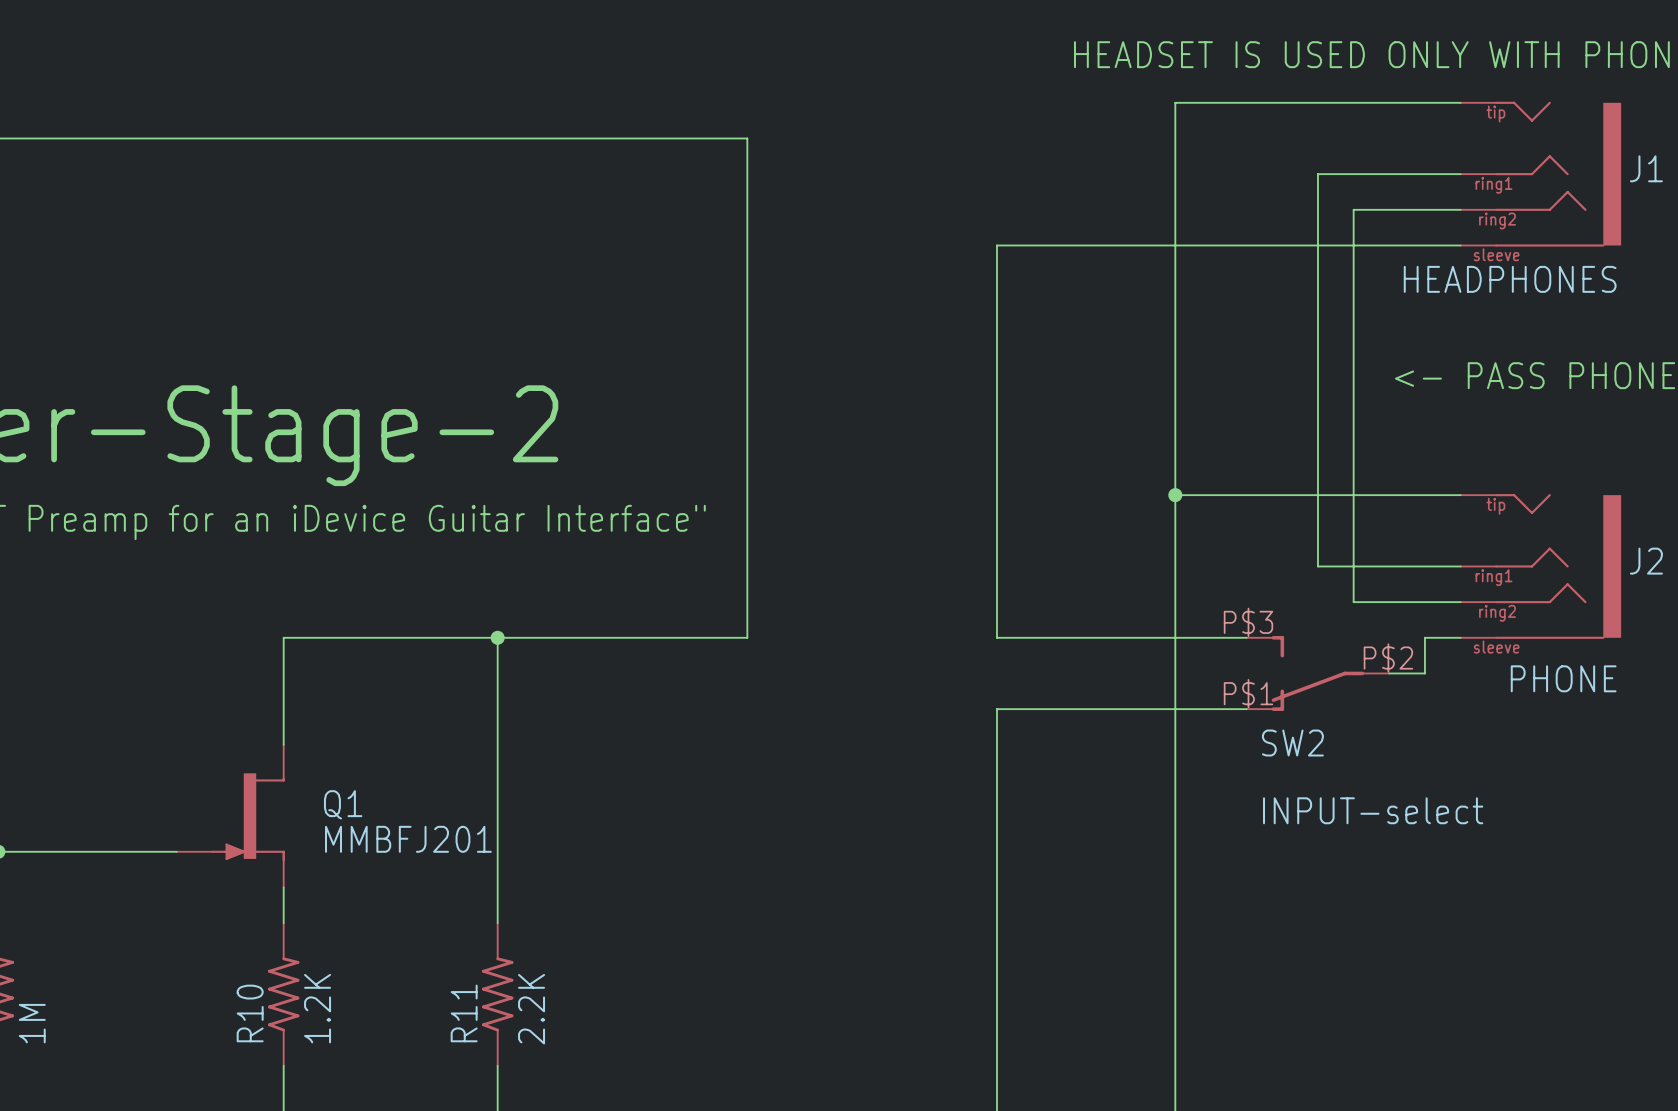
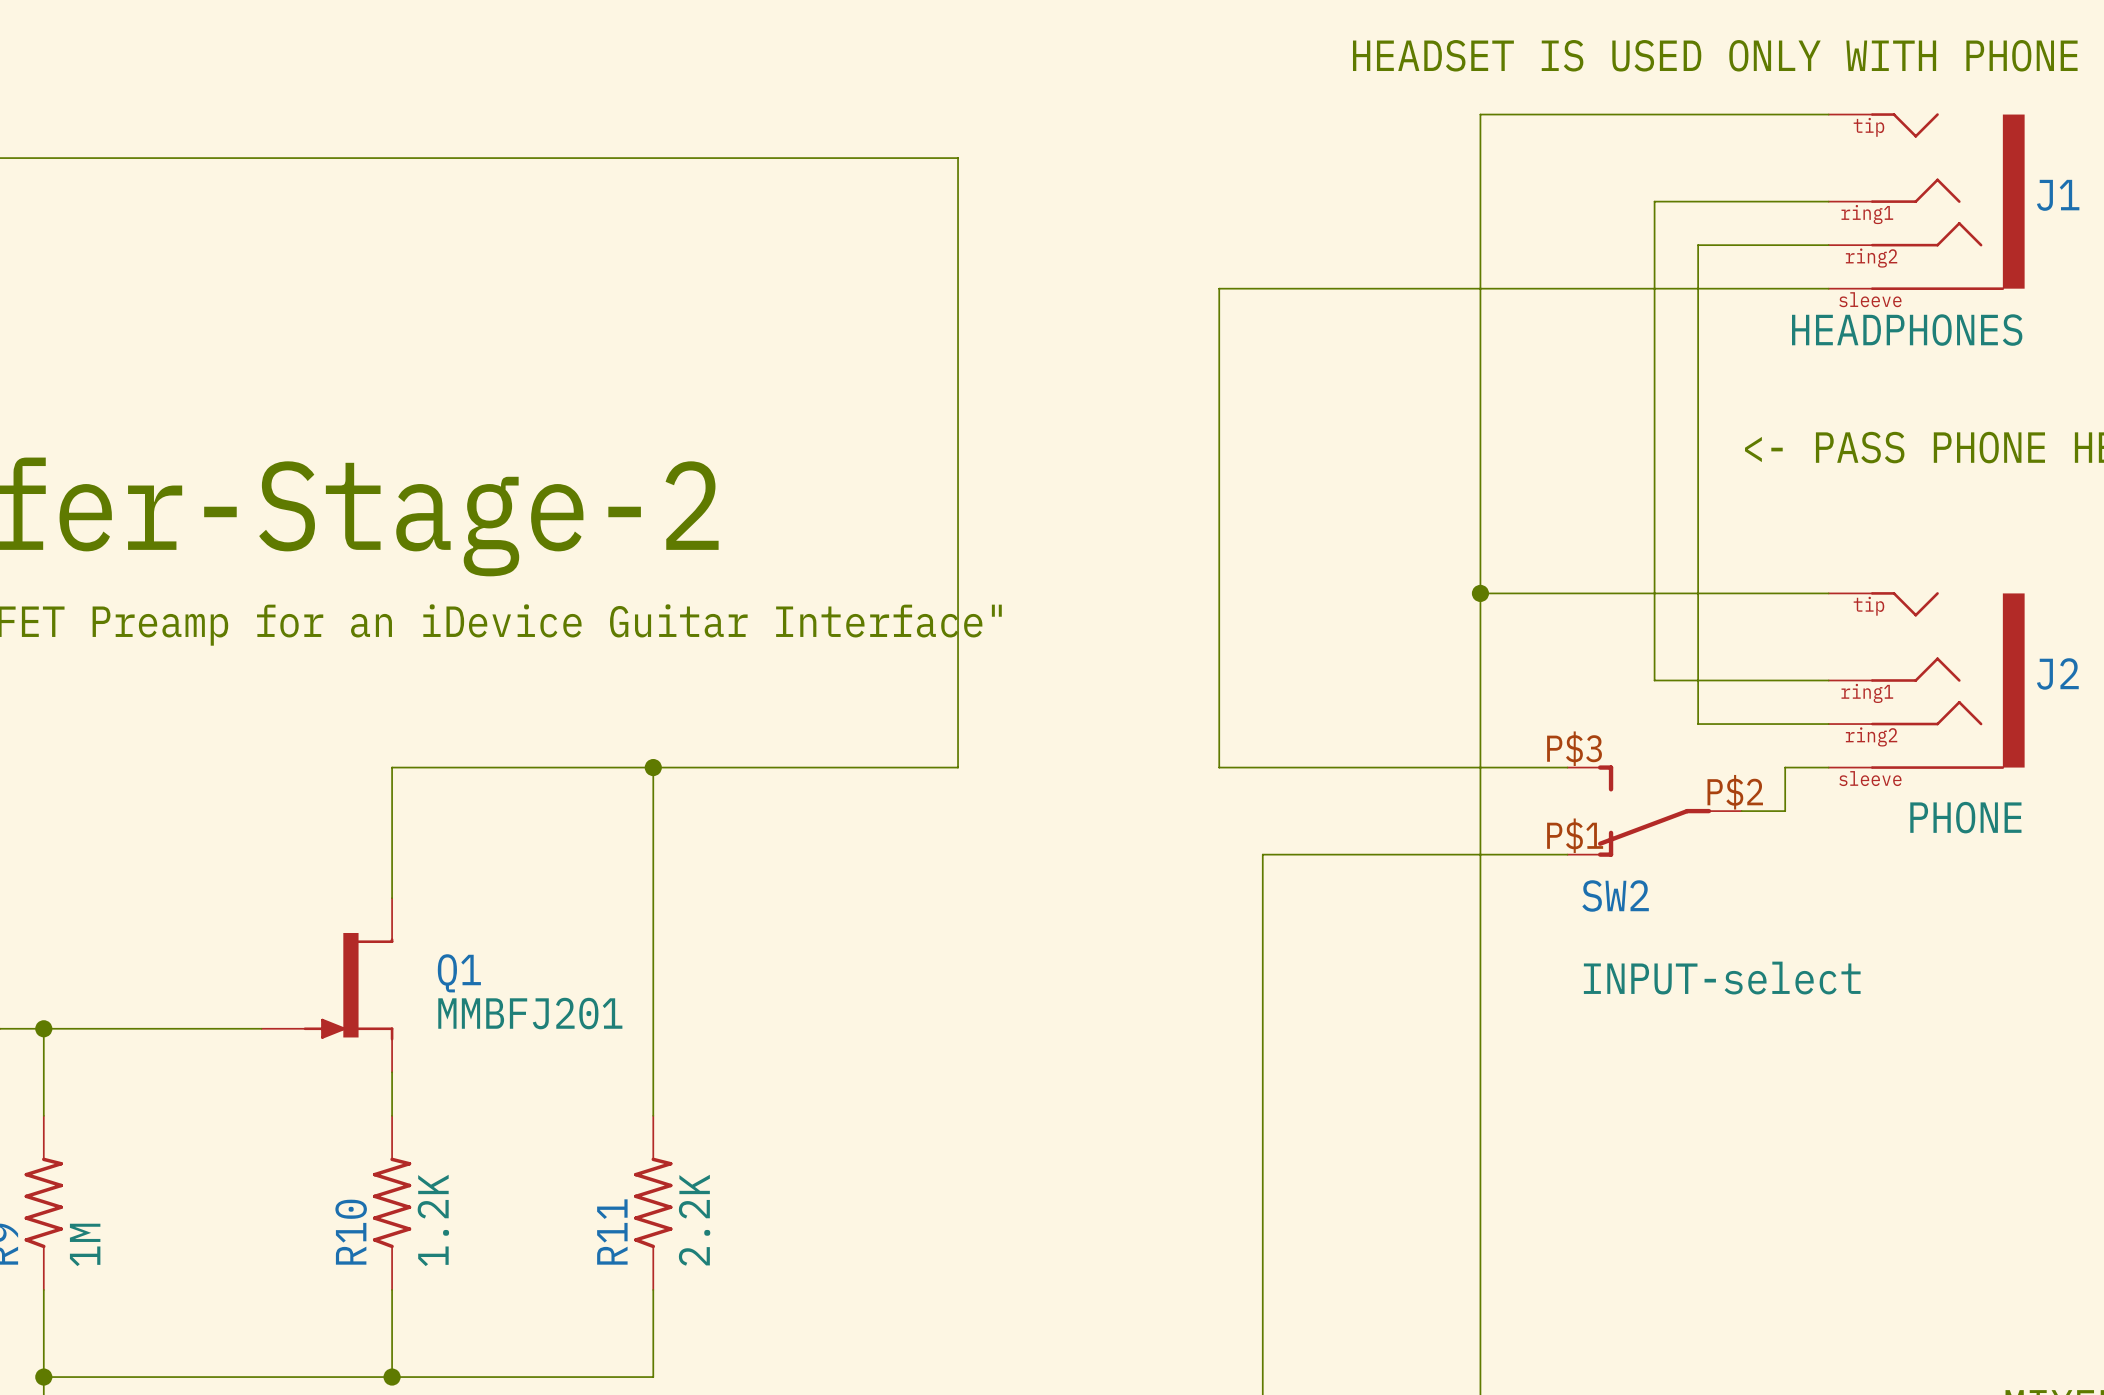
wire: (996, 245) (996, 637) -> (1262, 288) (1219, 288) (1219, 767) (1262, 767)

